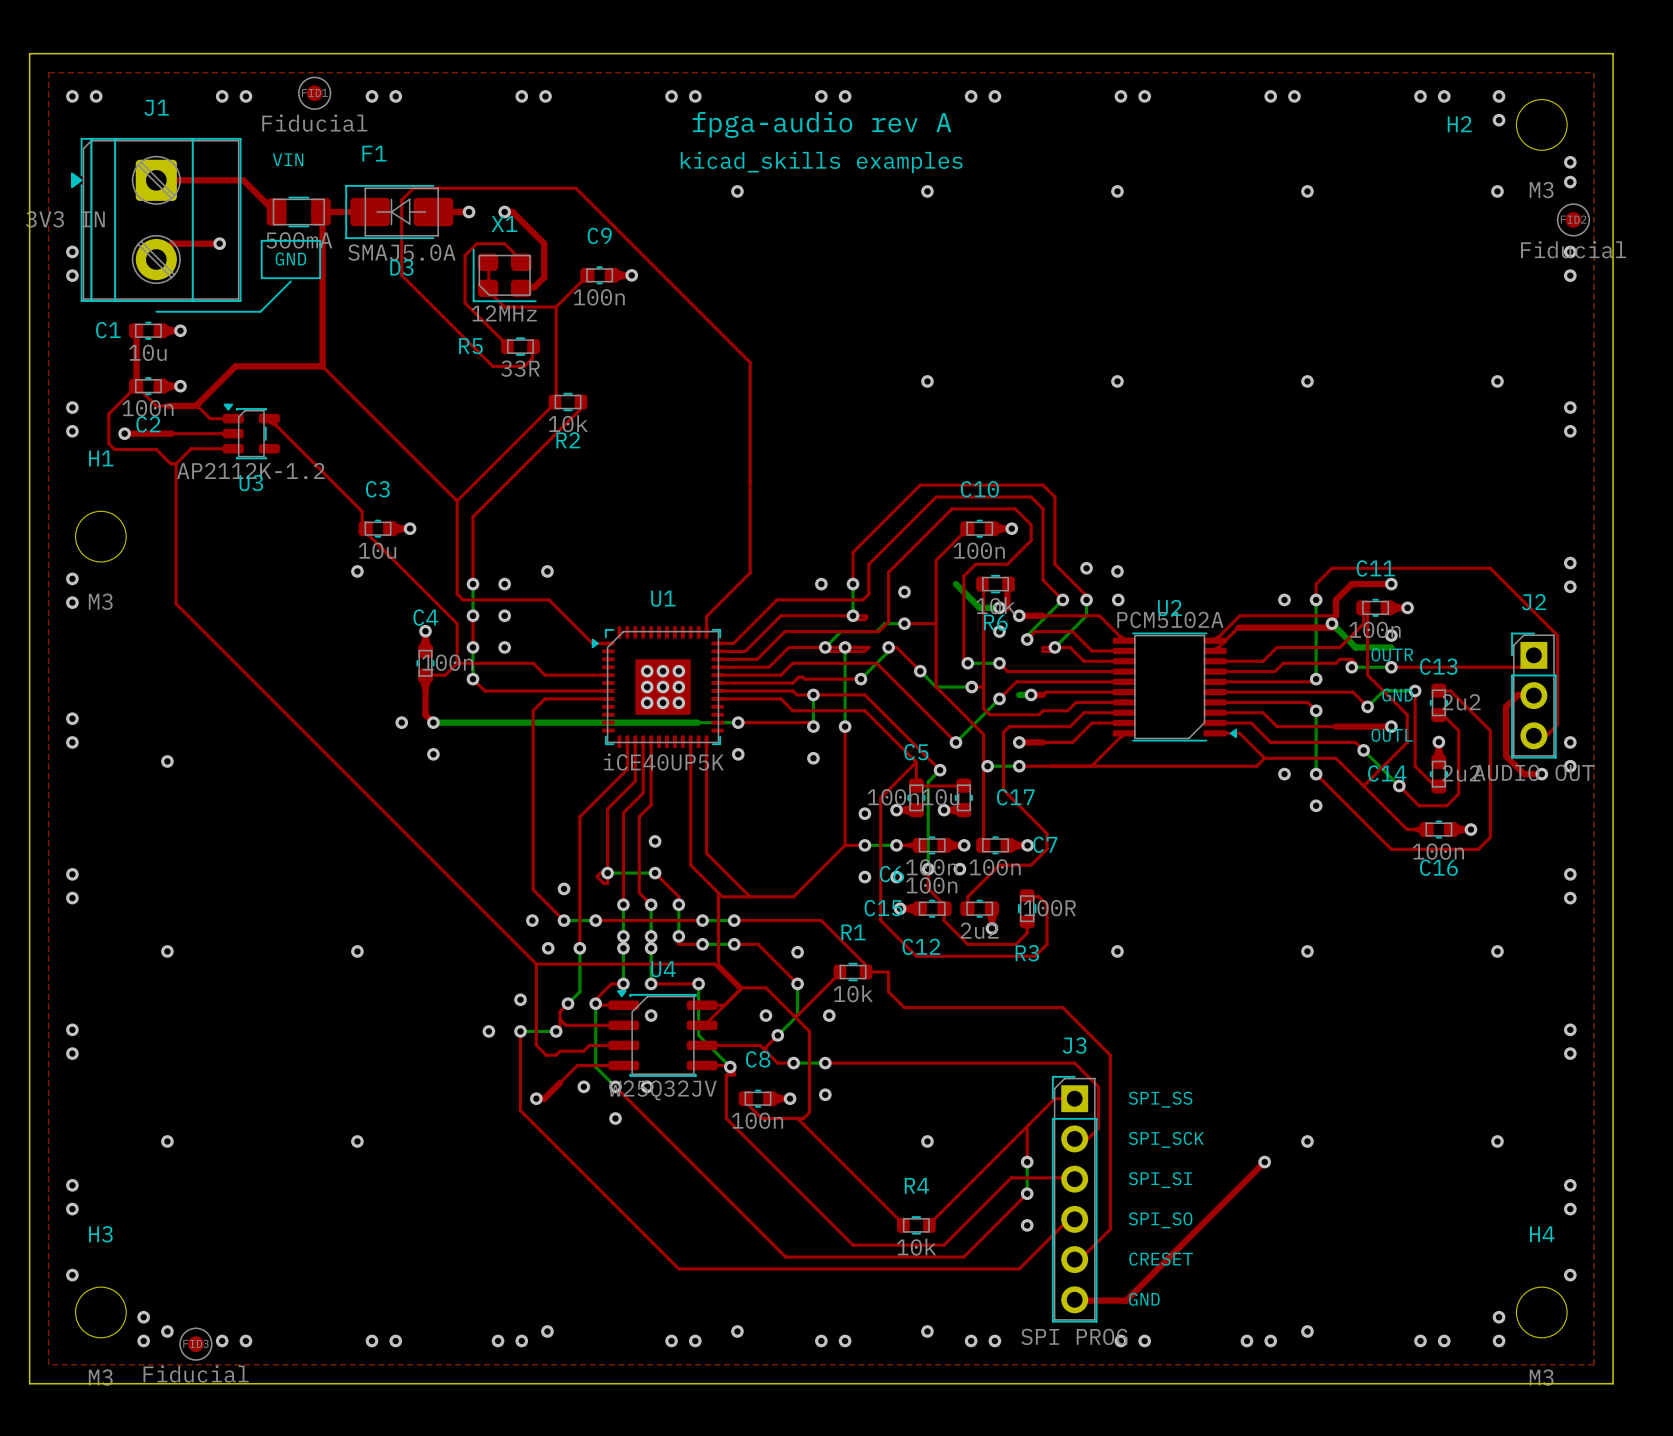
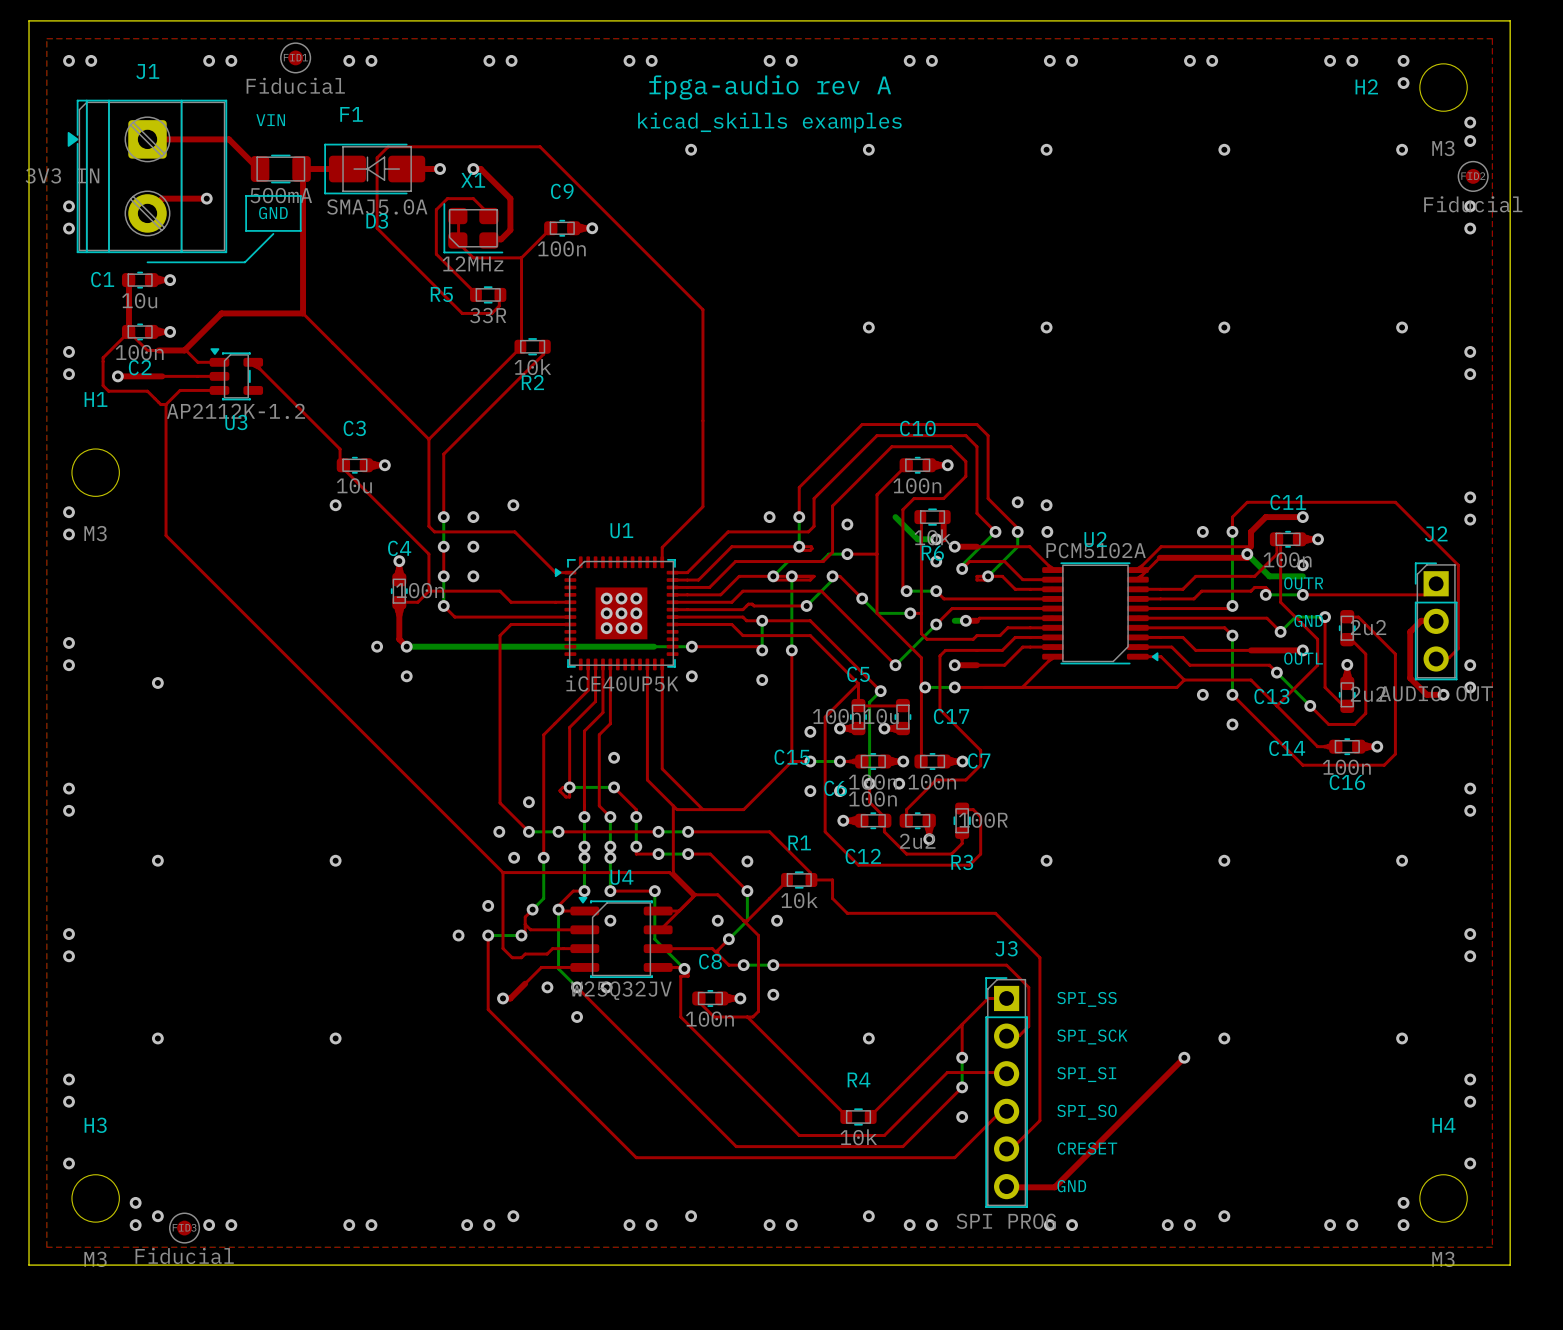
C13 name position: C13 (1438, 666) -> C13 (1271, 696)
C14 name position: C14 (1387, 773) -> C14 (1287, 748)
C15 name position: C15 (883, 908) -> C15 (792, 757)

